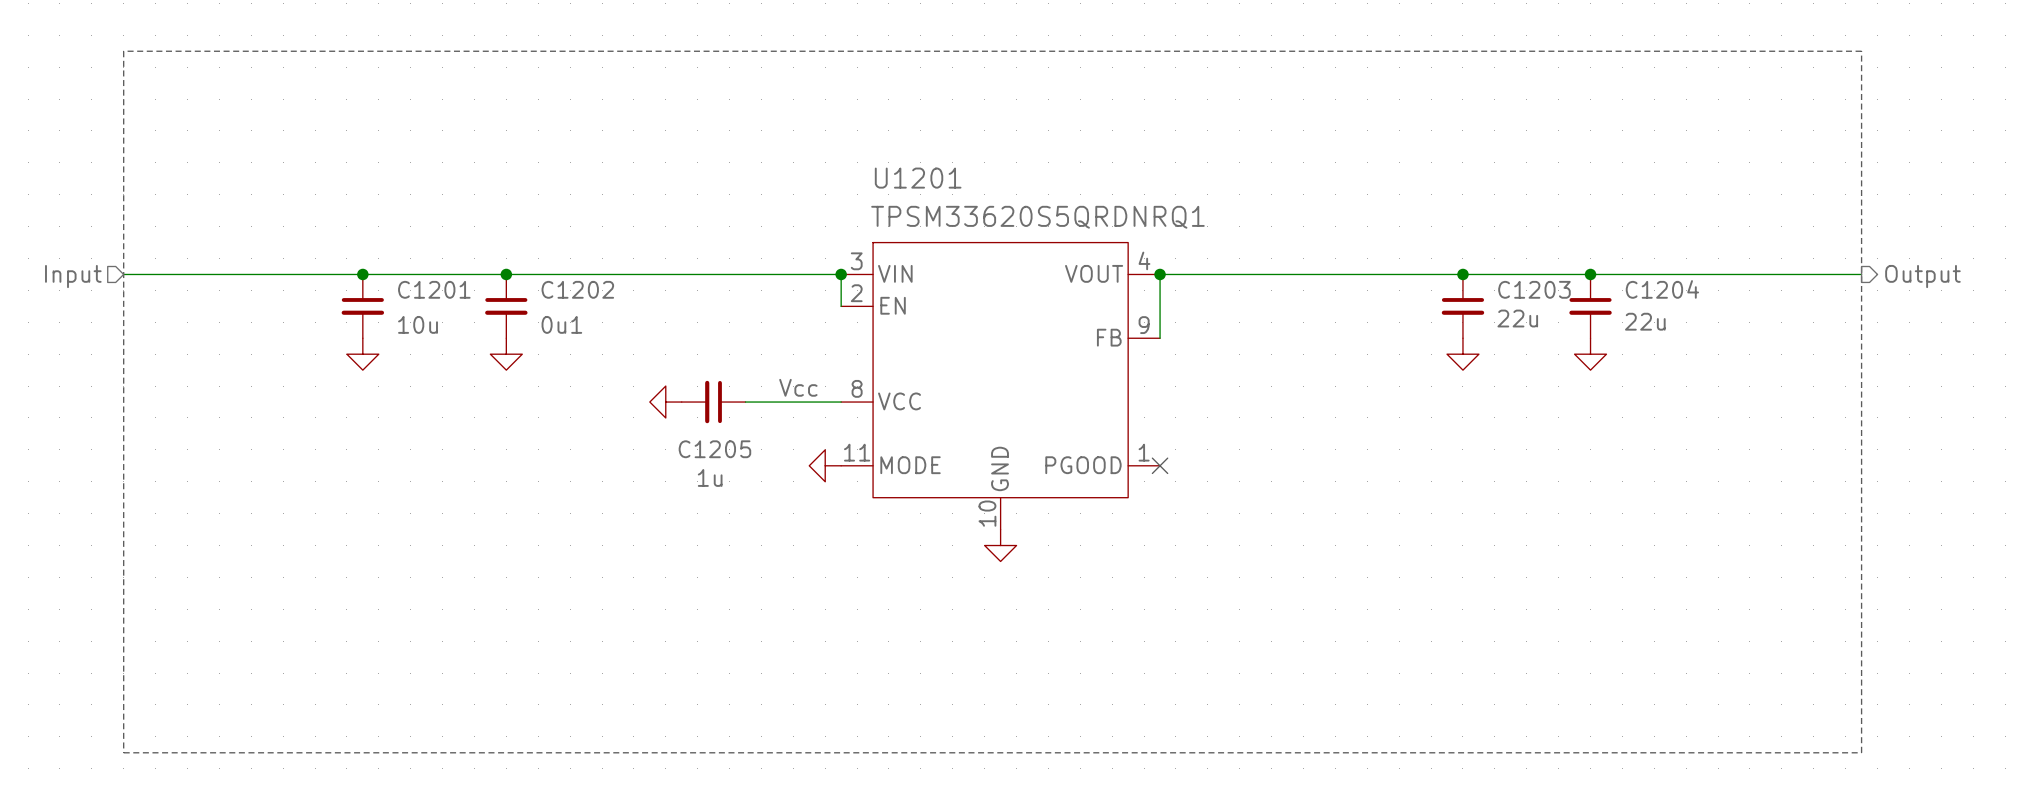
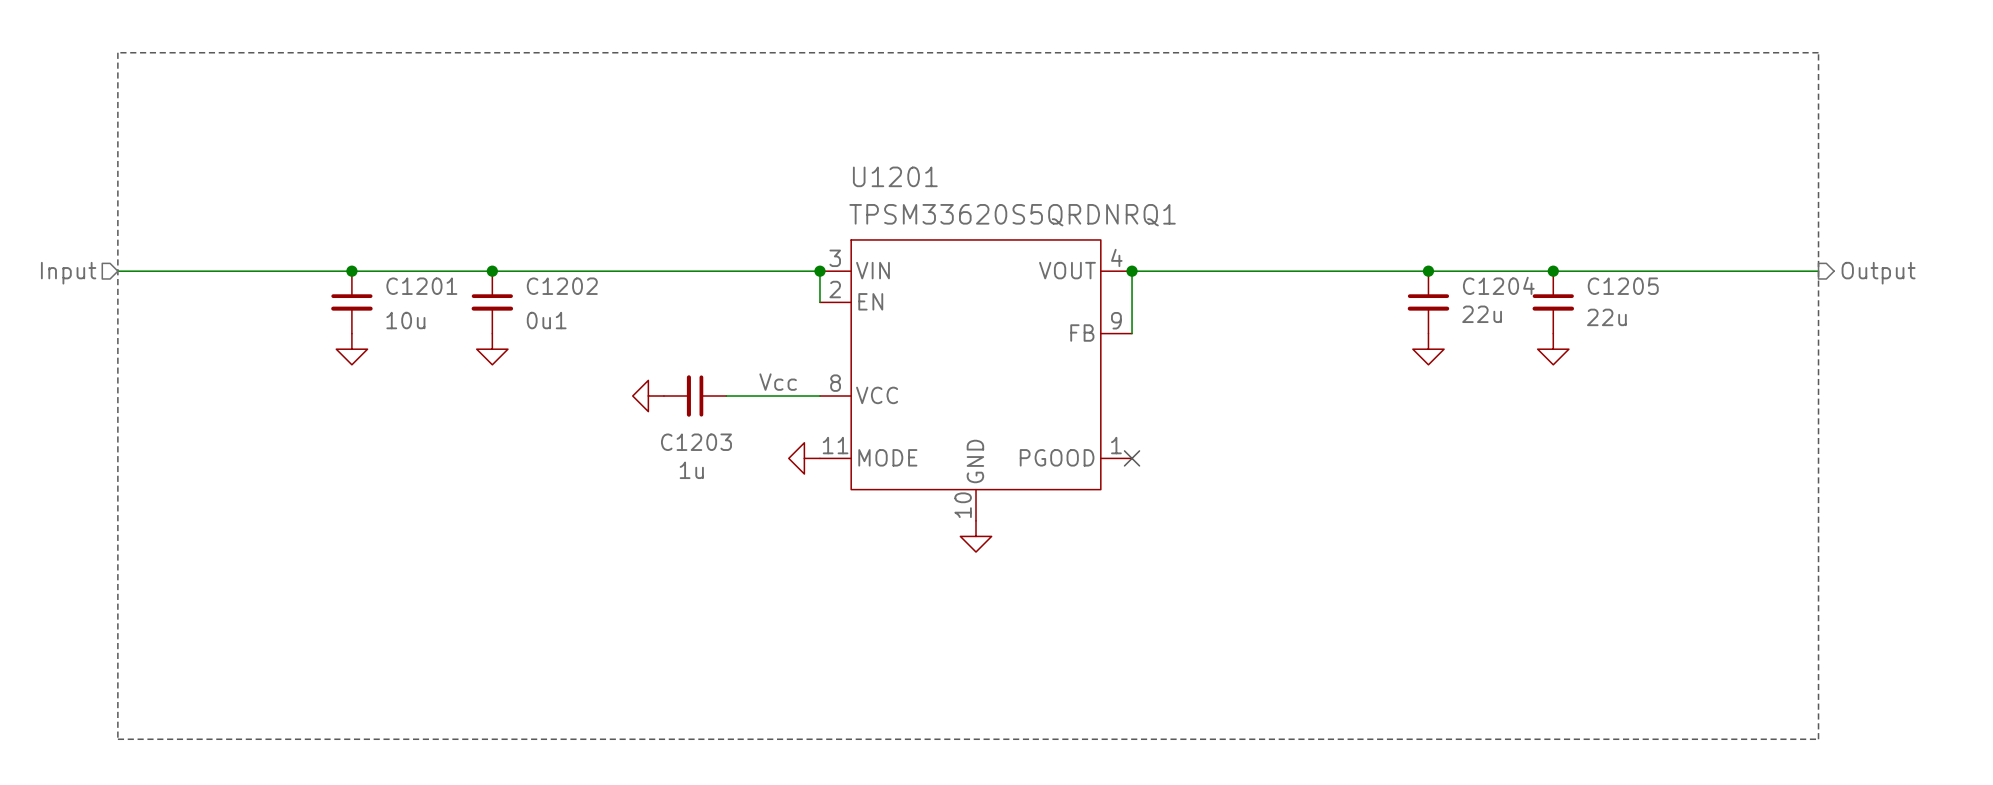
C1203 name: C1203 (1534, 289) -> C1204 (1498, 285)
C1204 name: C1204 (1662, 289) -> C1205 (1623, 286)
C1205 name: C1205 (714, 449) -> C1203 (696, 442)

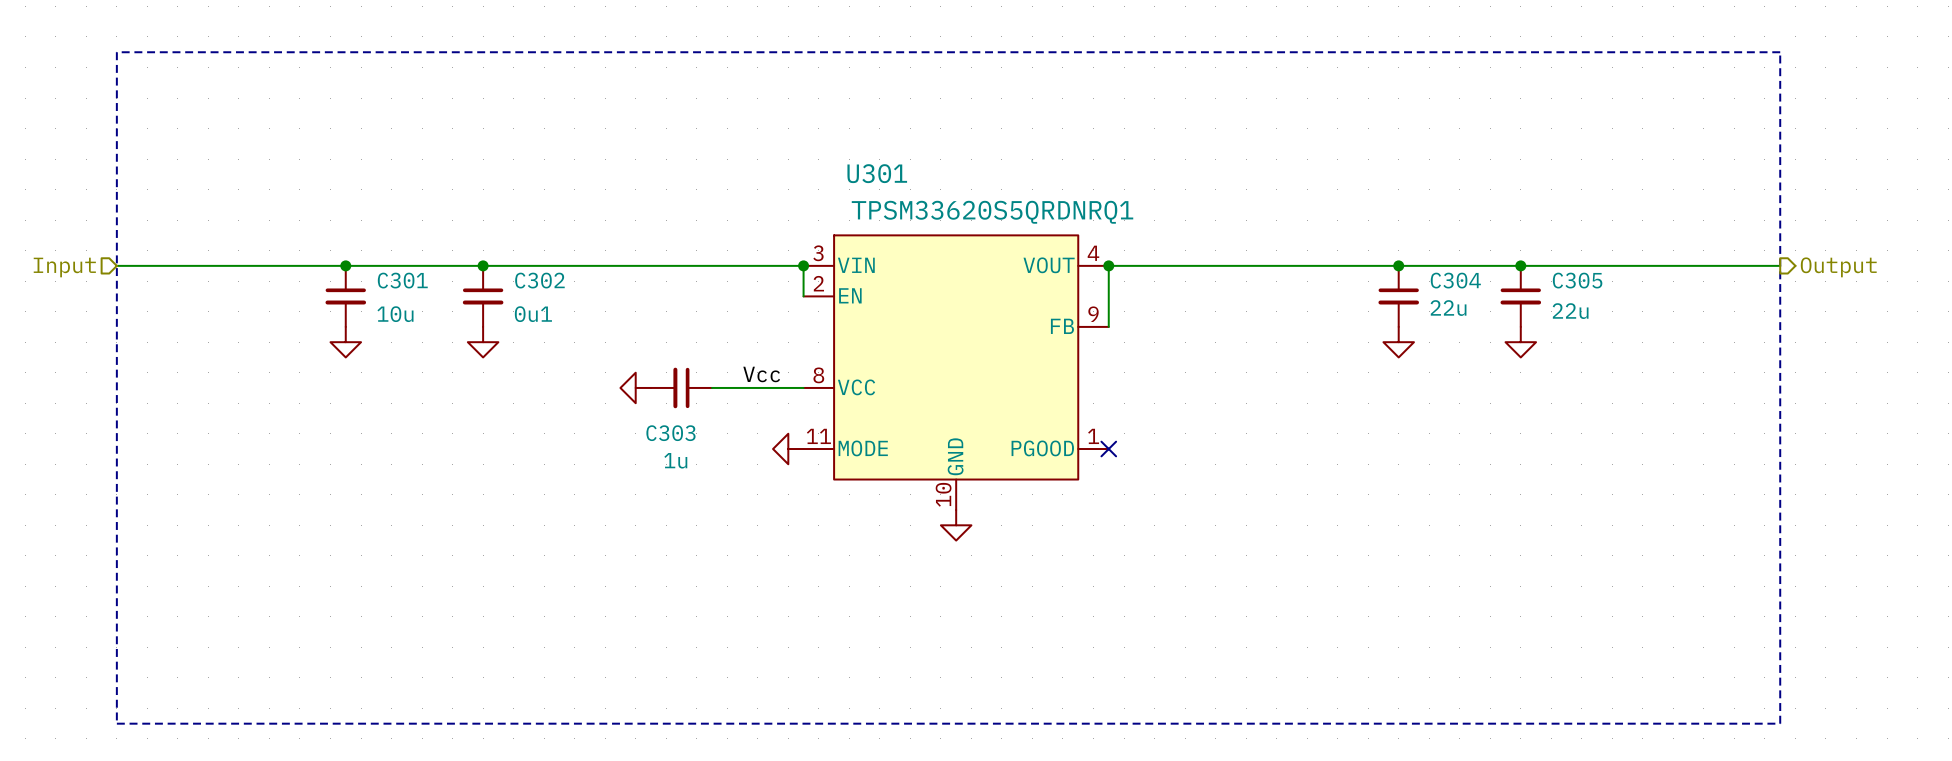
U1201 name: U1201 (895, 176) -> U301 (877, 173)
C1204 name: C1204 (1498, 285) -> C304 (1455, 280)
C1201 name: C1201 (421, 286) -> C301 (402, 280)
C1202 name: C1202 (562, 286) -> C302 (539, 280)
C1205 name: C1205 (1623, 286) -> C305 (1577, 280)
C1203 name: C1203 (696, 442) -> C303 (670, 433)

